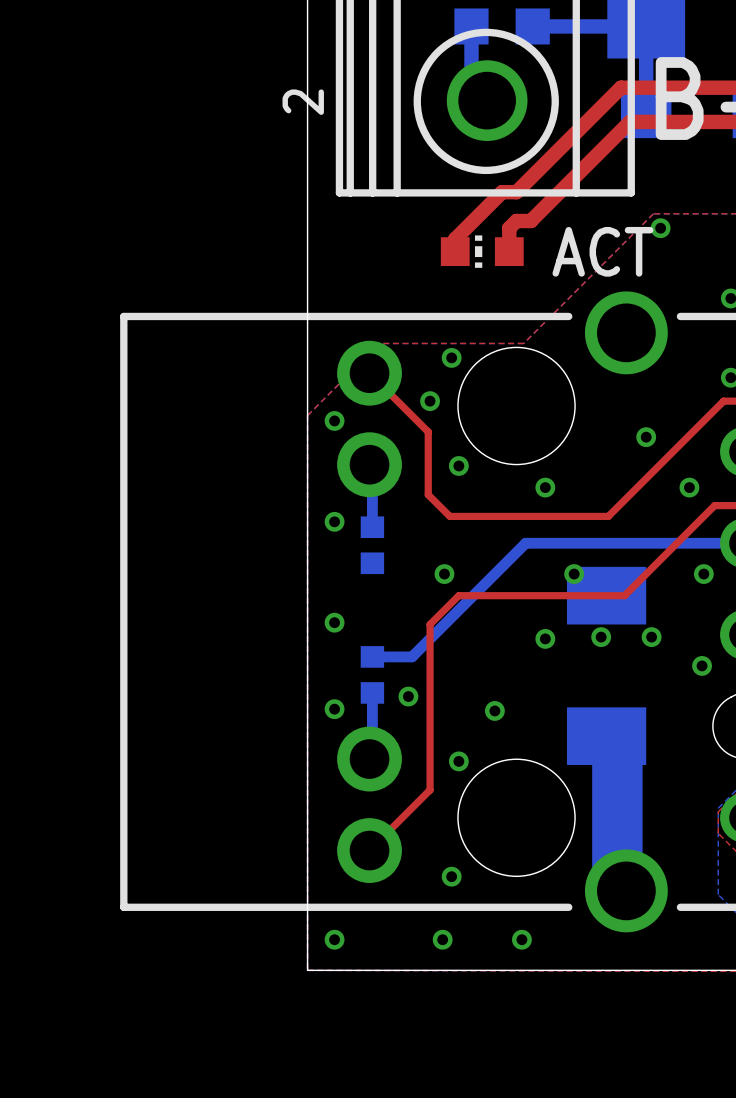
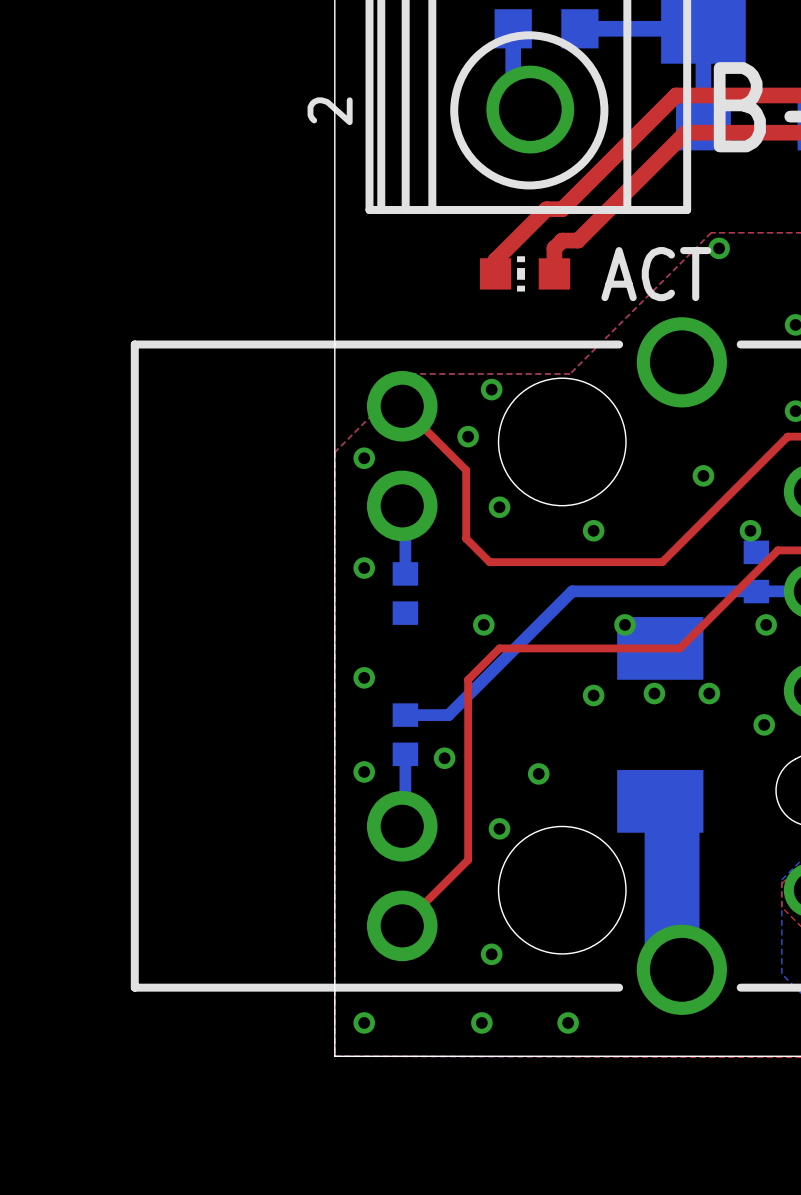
part: none -> (756, 571)

